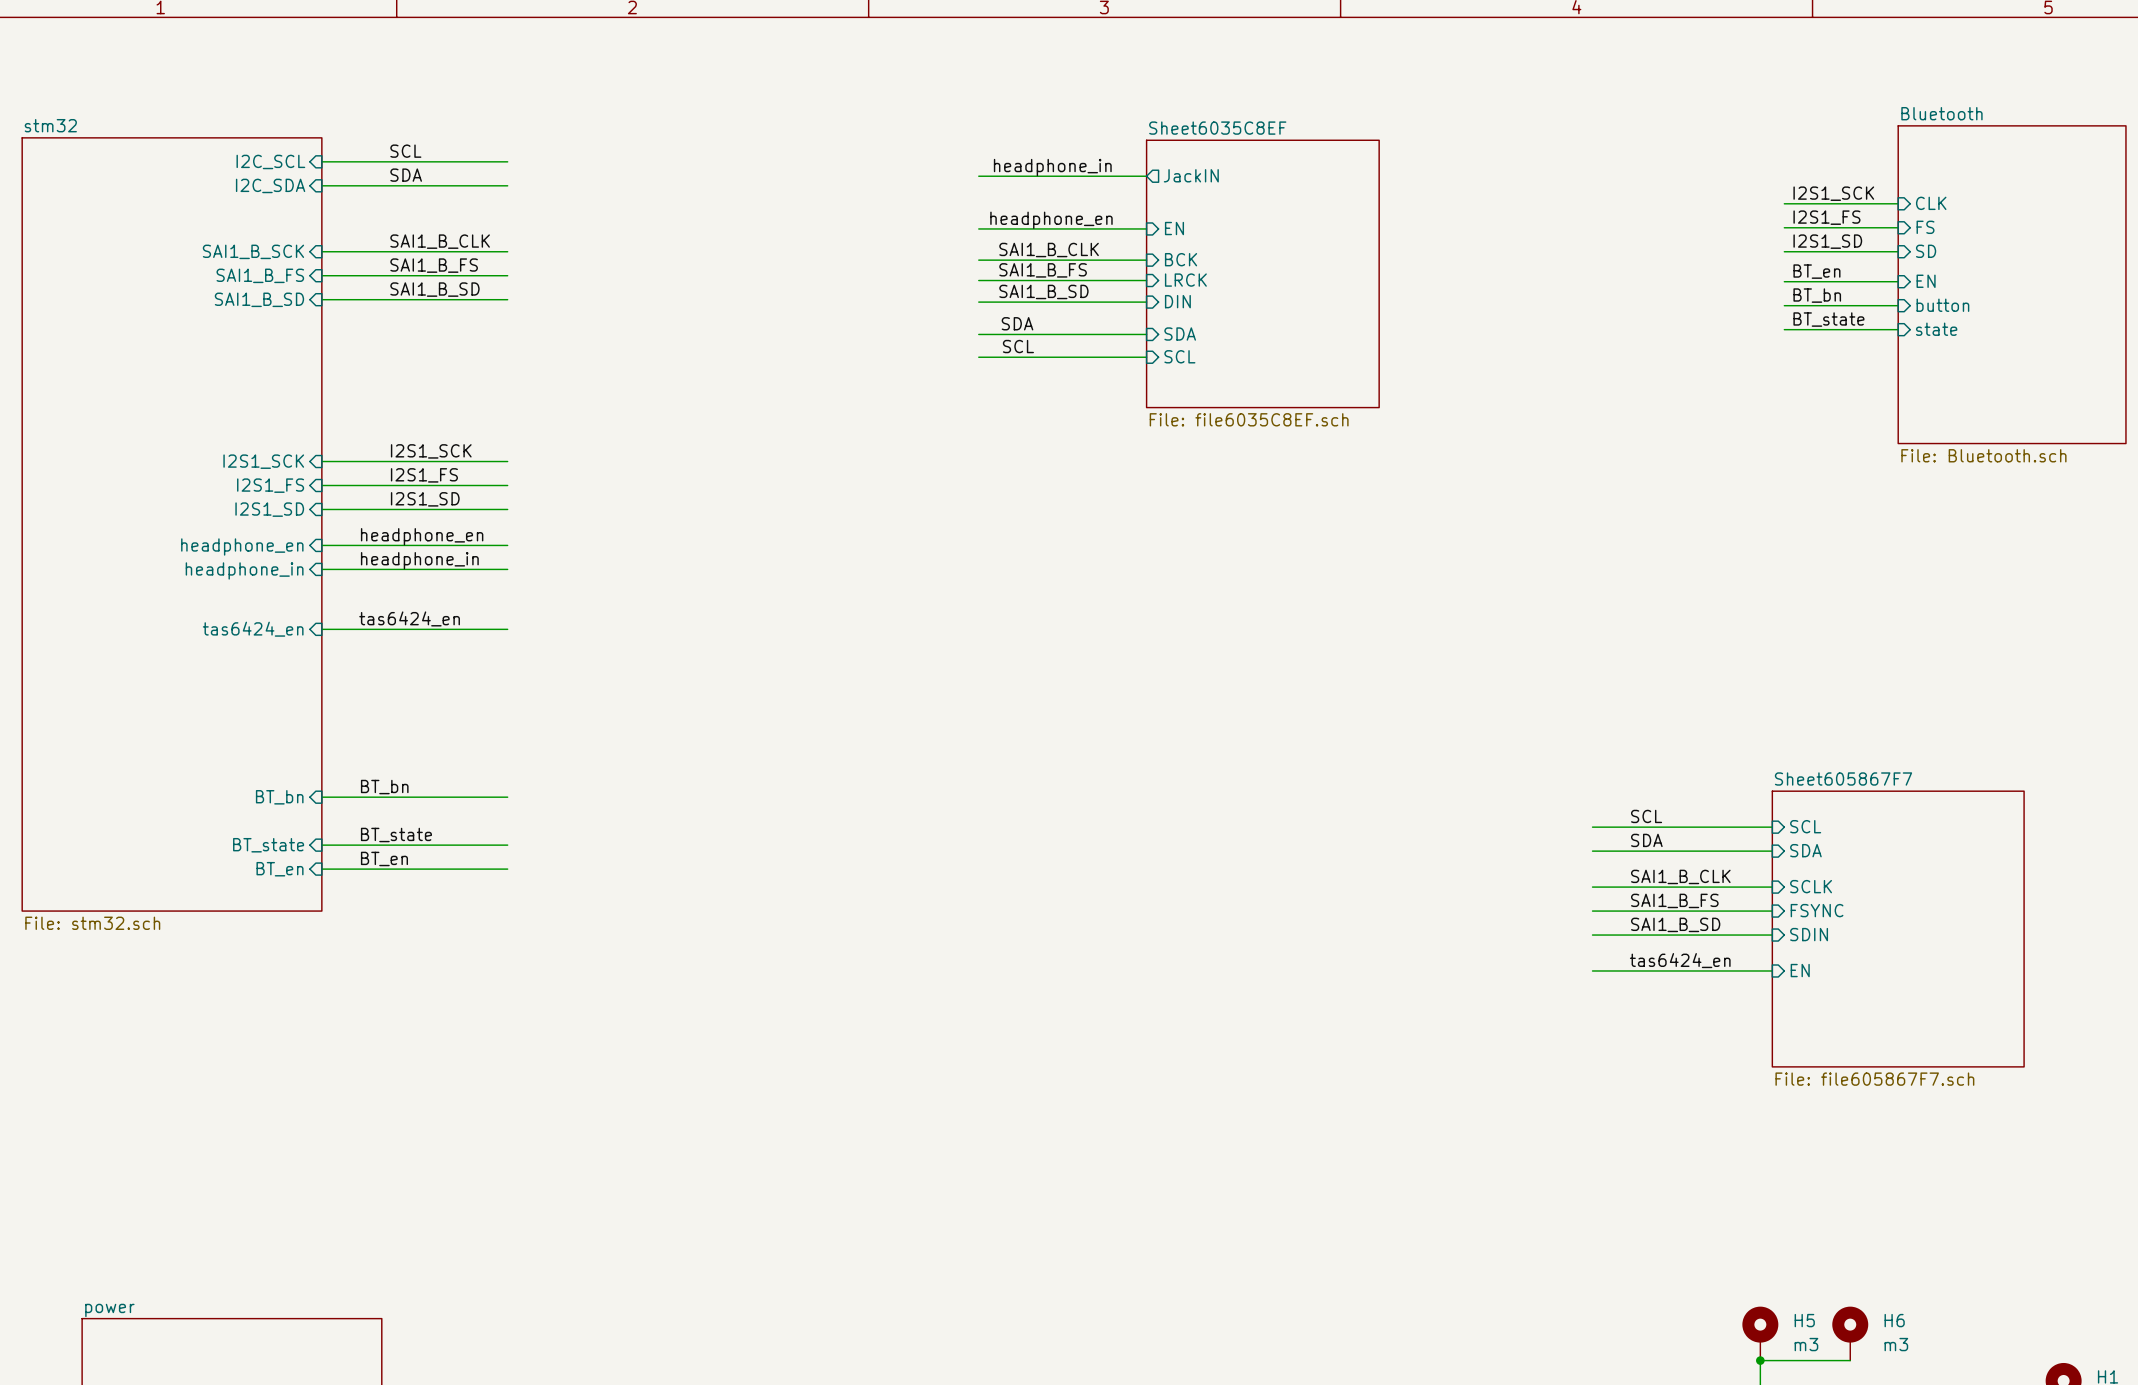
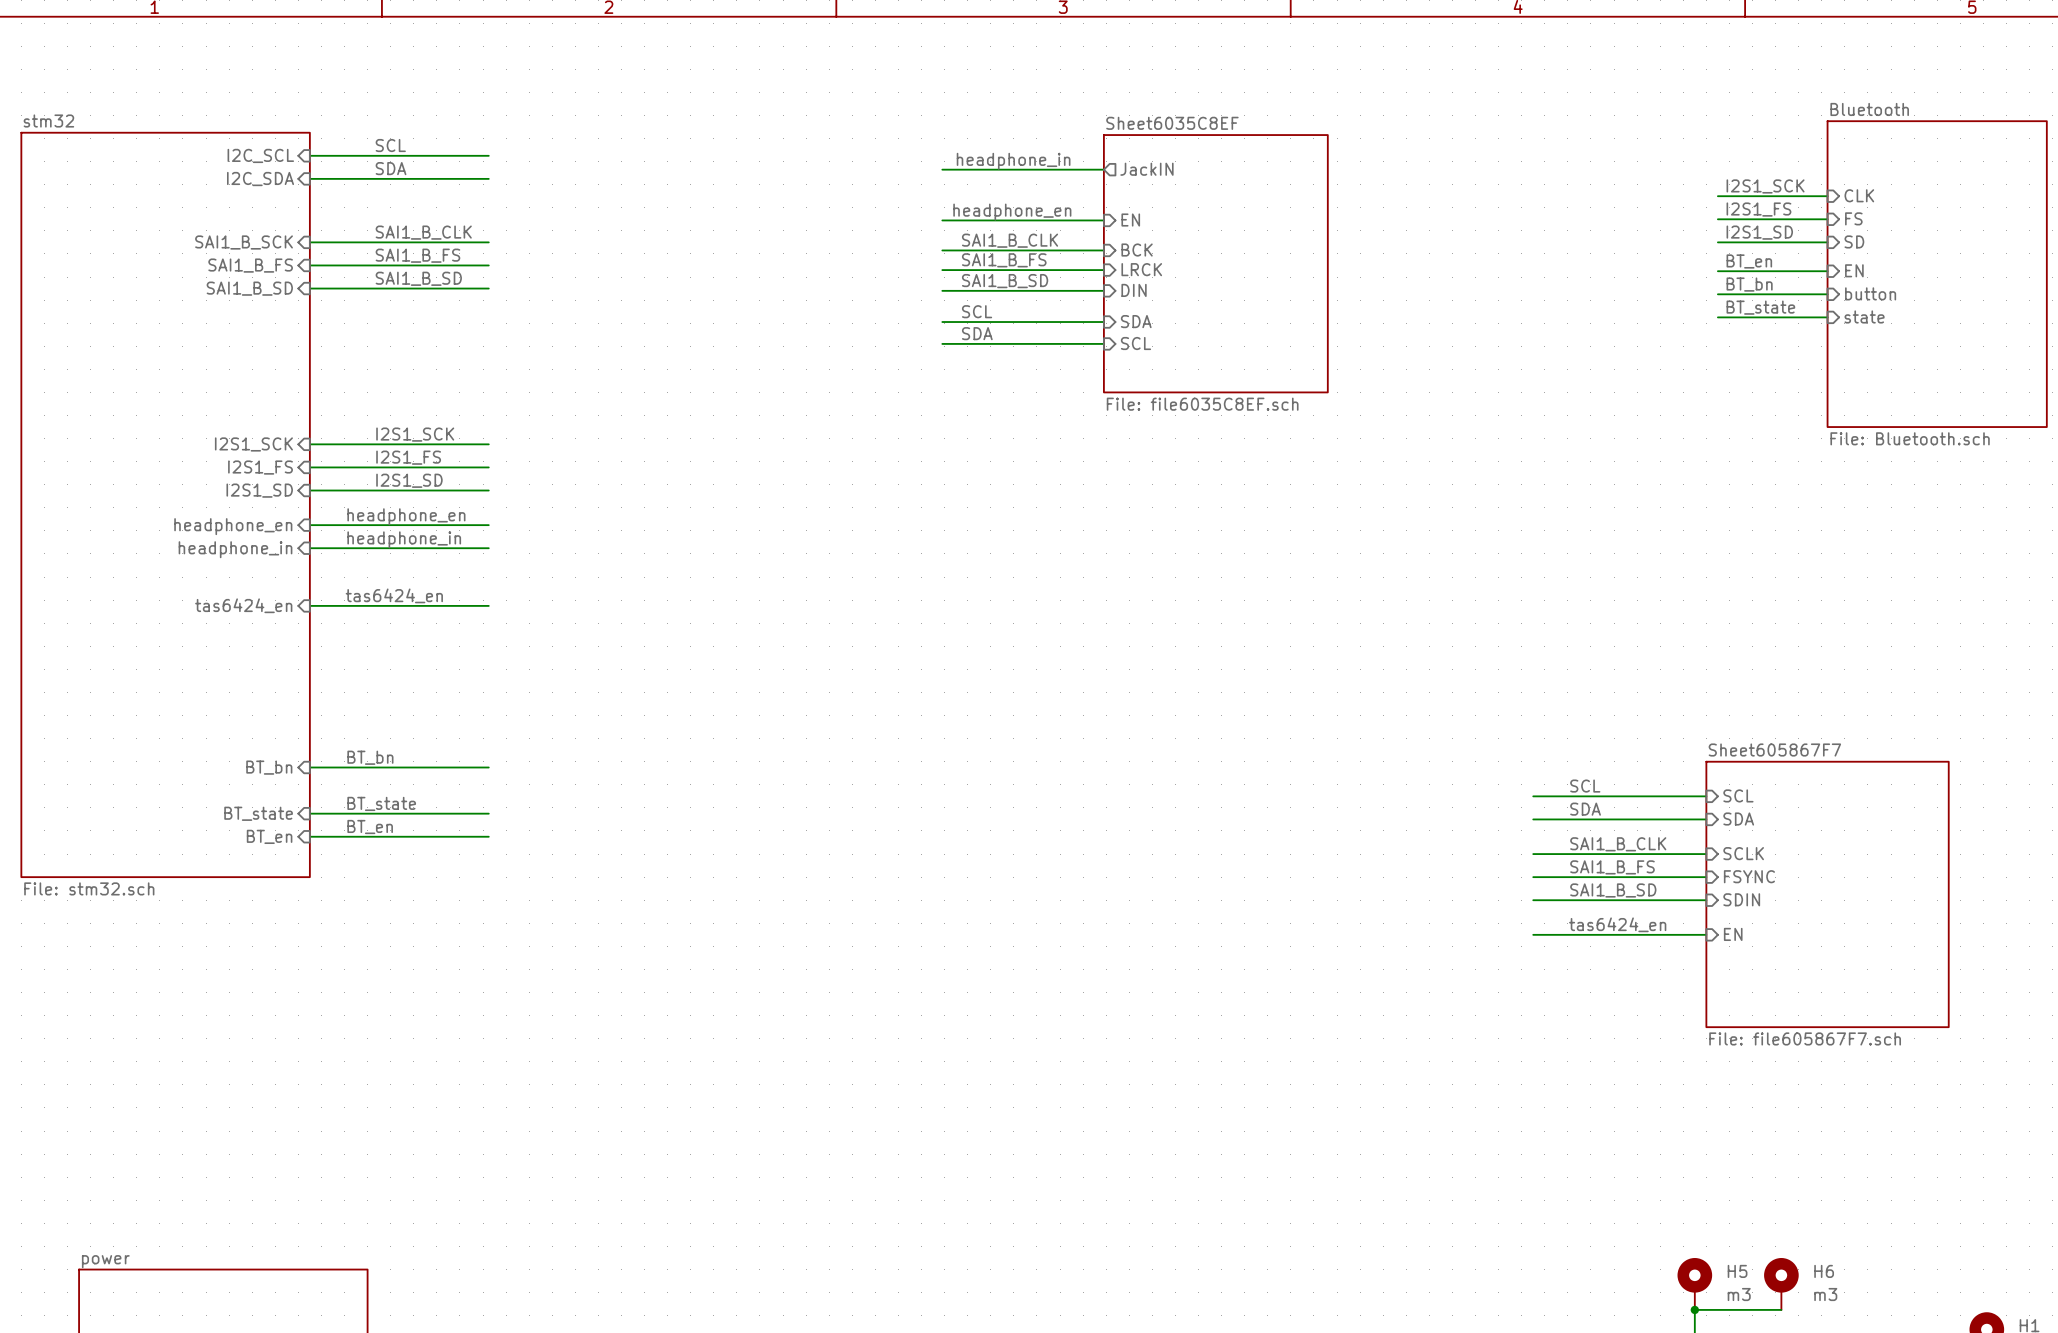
label: SDA (1017, 323) -> SCL (977, 311)
label: SCL (1018, 346) -> SDA (977, 333)

